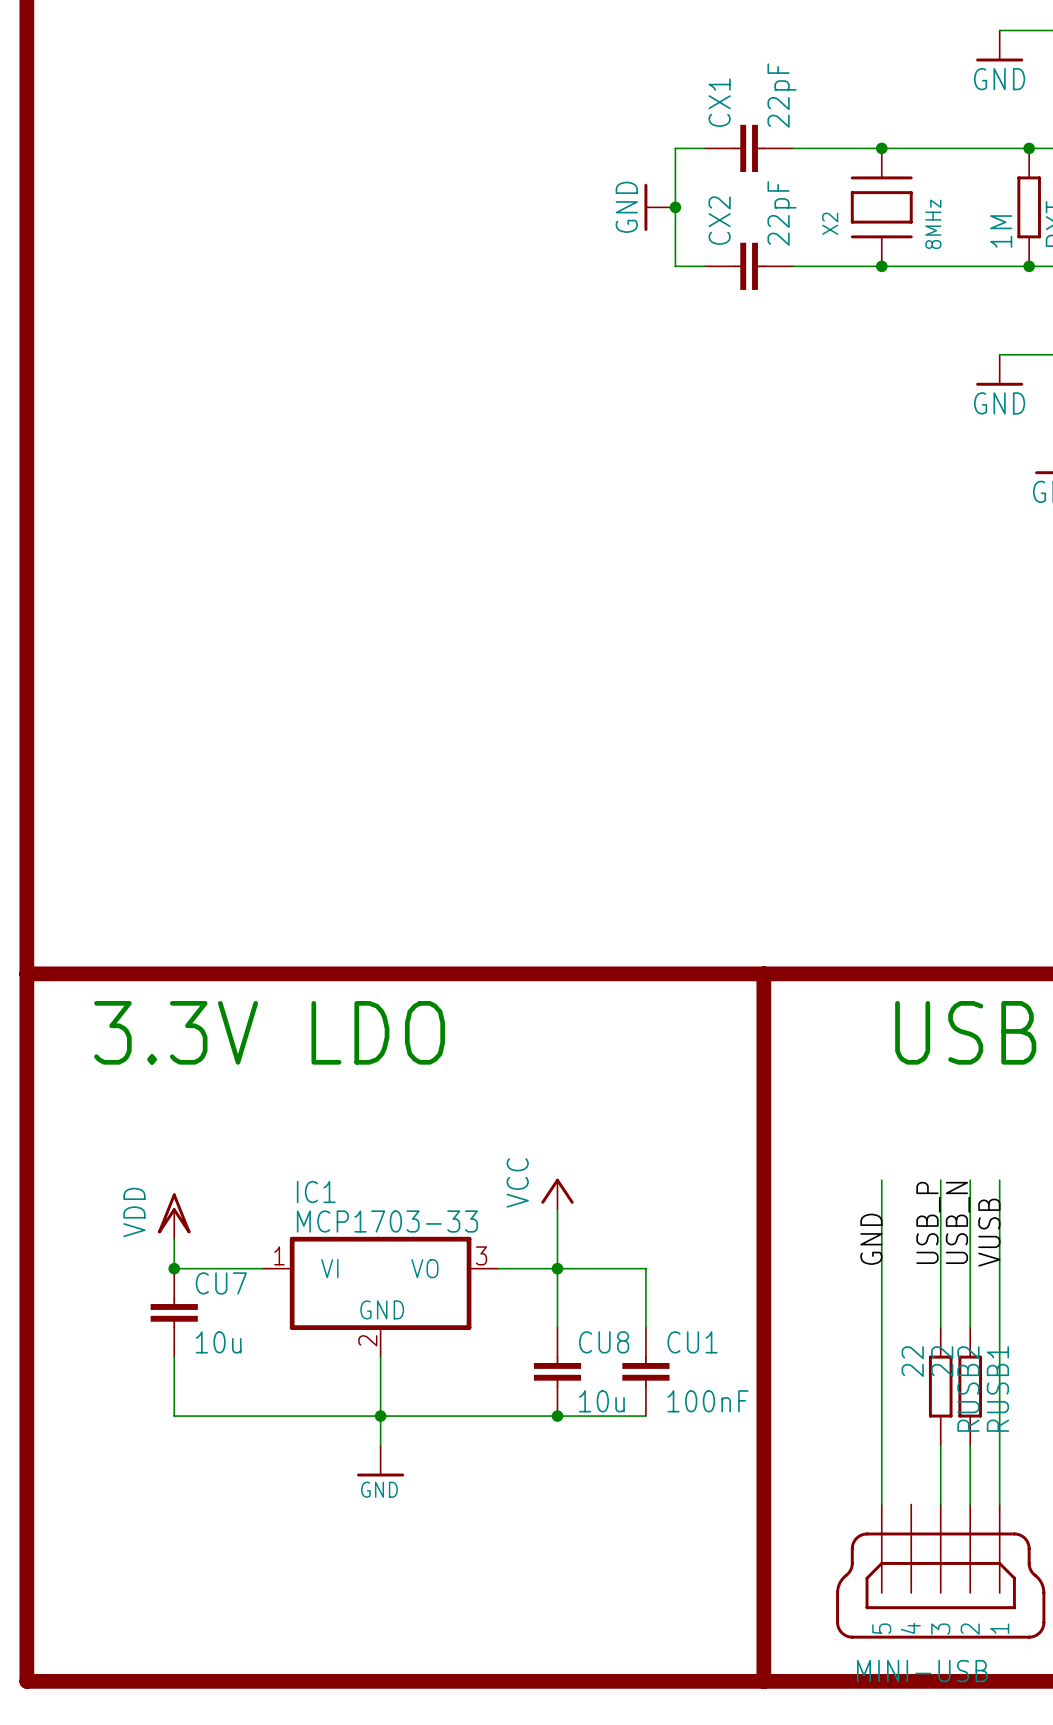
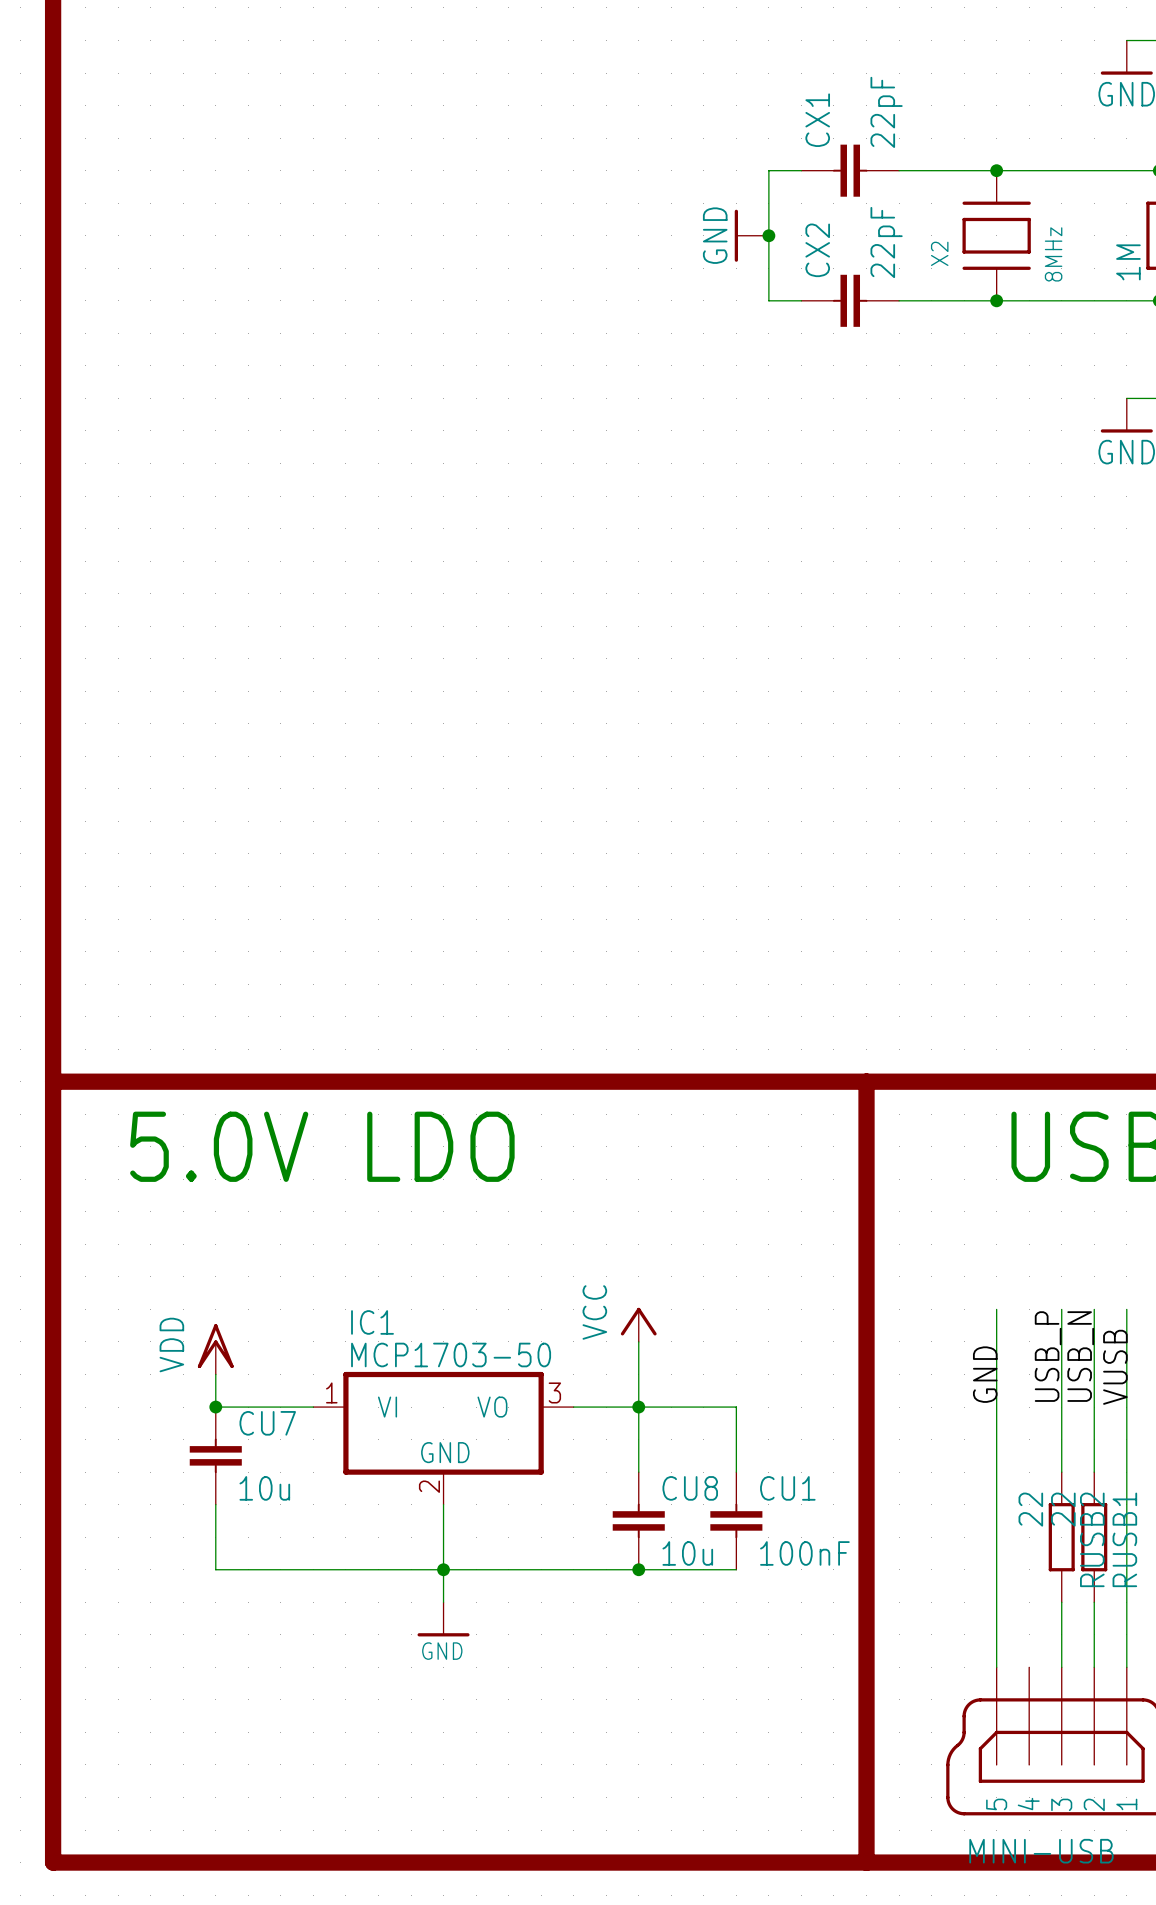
text: 3.3V LDO (269, 1032) -> 5.0V LDO (322, 1146)
IC1 value: MCP1703-33 (387, 1221) -> MCP1703-50 (451, 1355)

